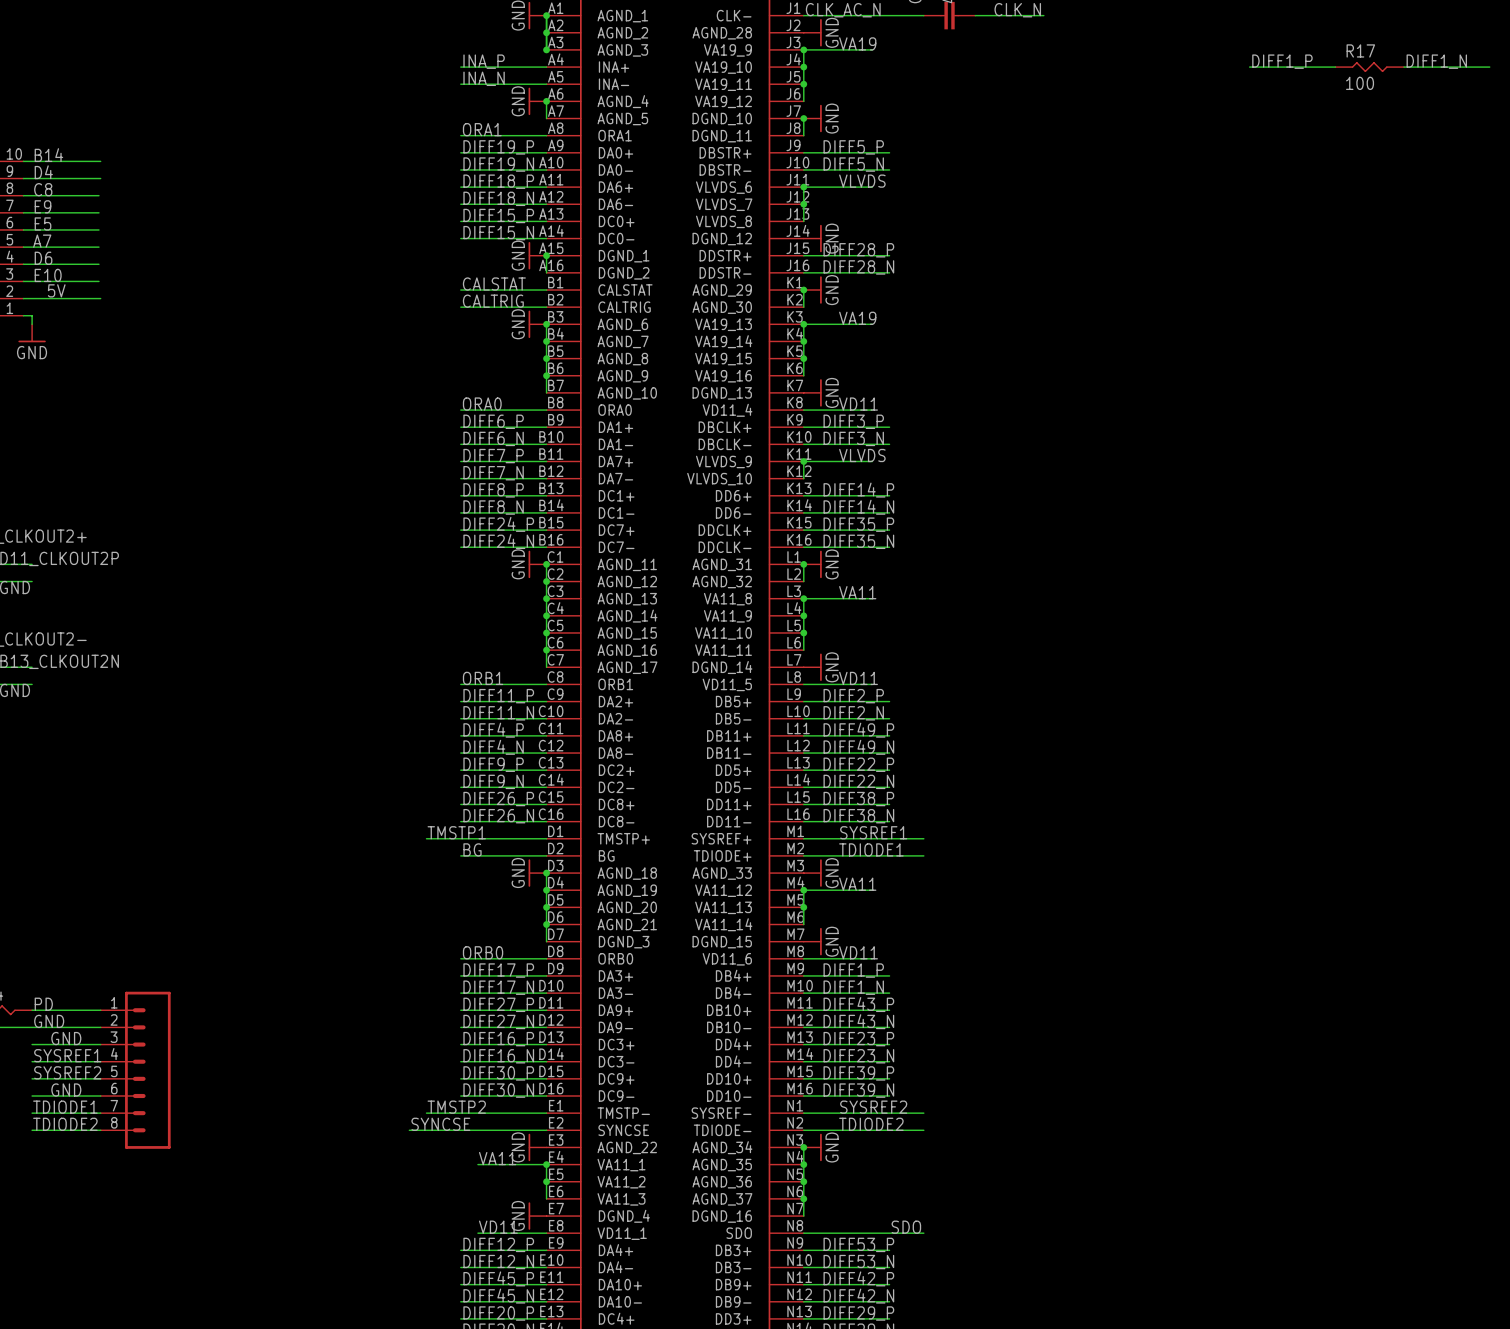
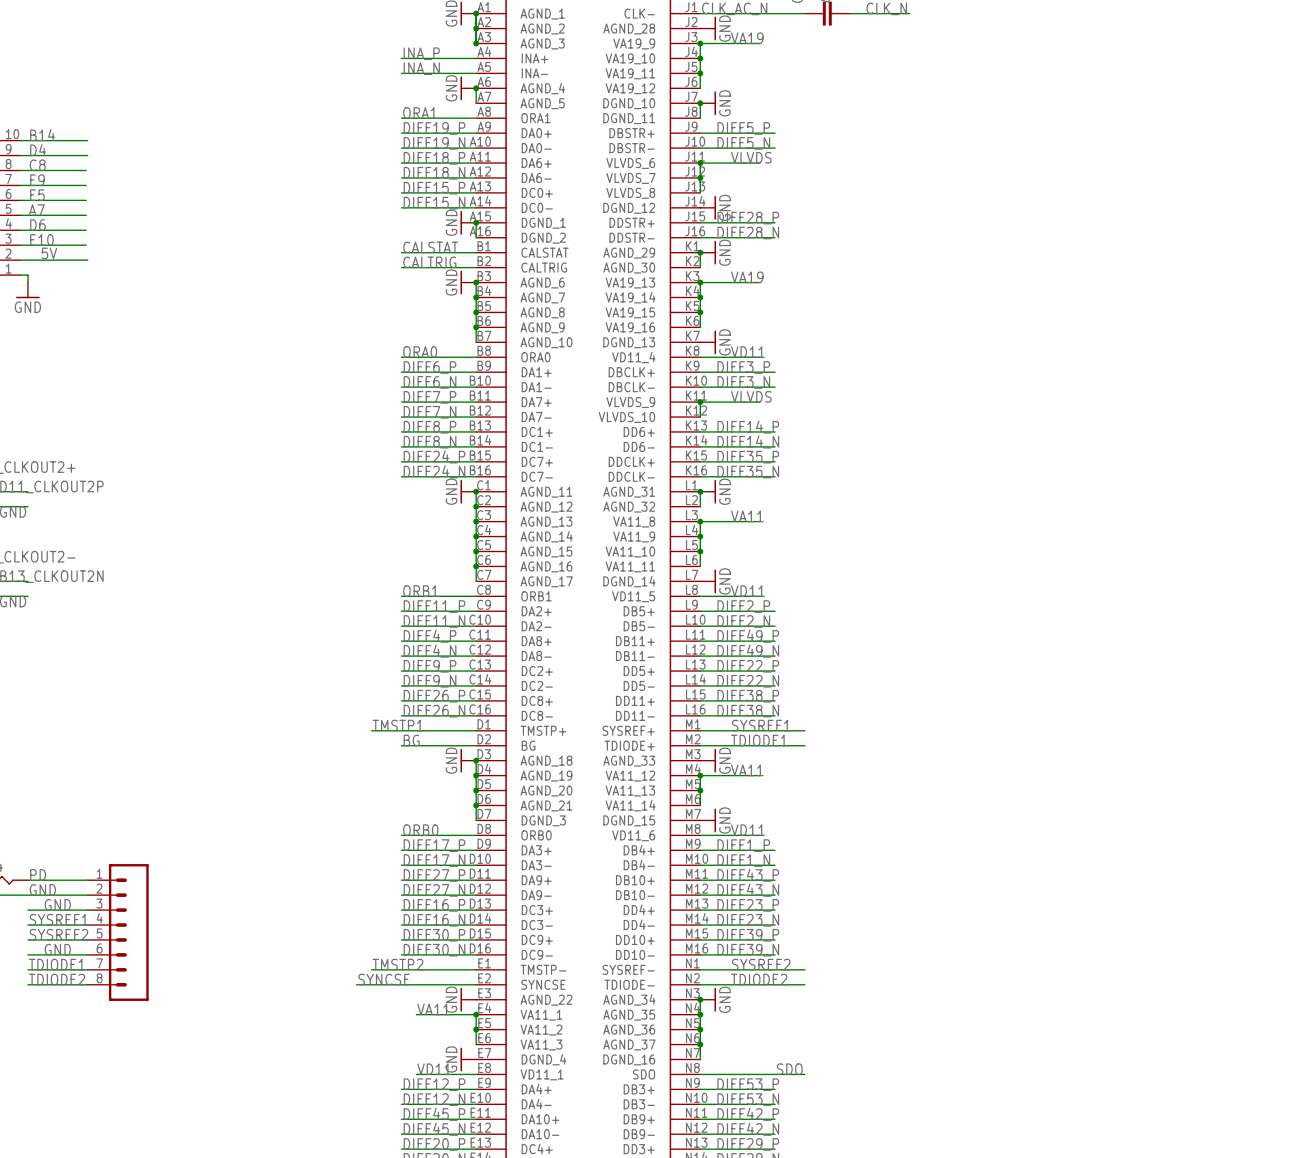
label: DIFF1_P (1282, 61) -> none
label: DIFF1_N (1436, 61) -> none
wire: (1249, 67) (1335, 67) -> none
R17: 100 (1369, 67) -> none
wire: (1403, 67) (1489, 67) -> none

